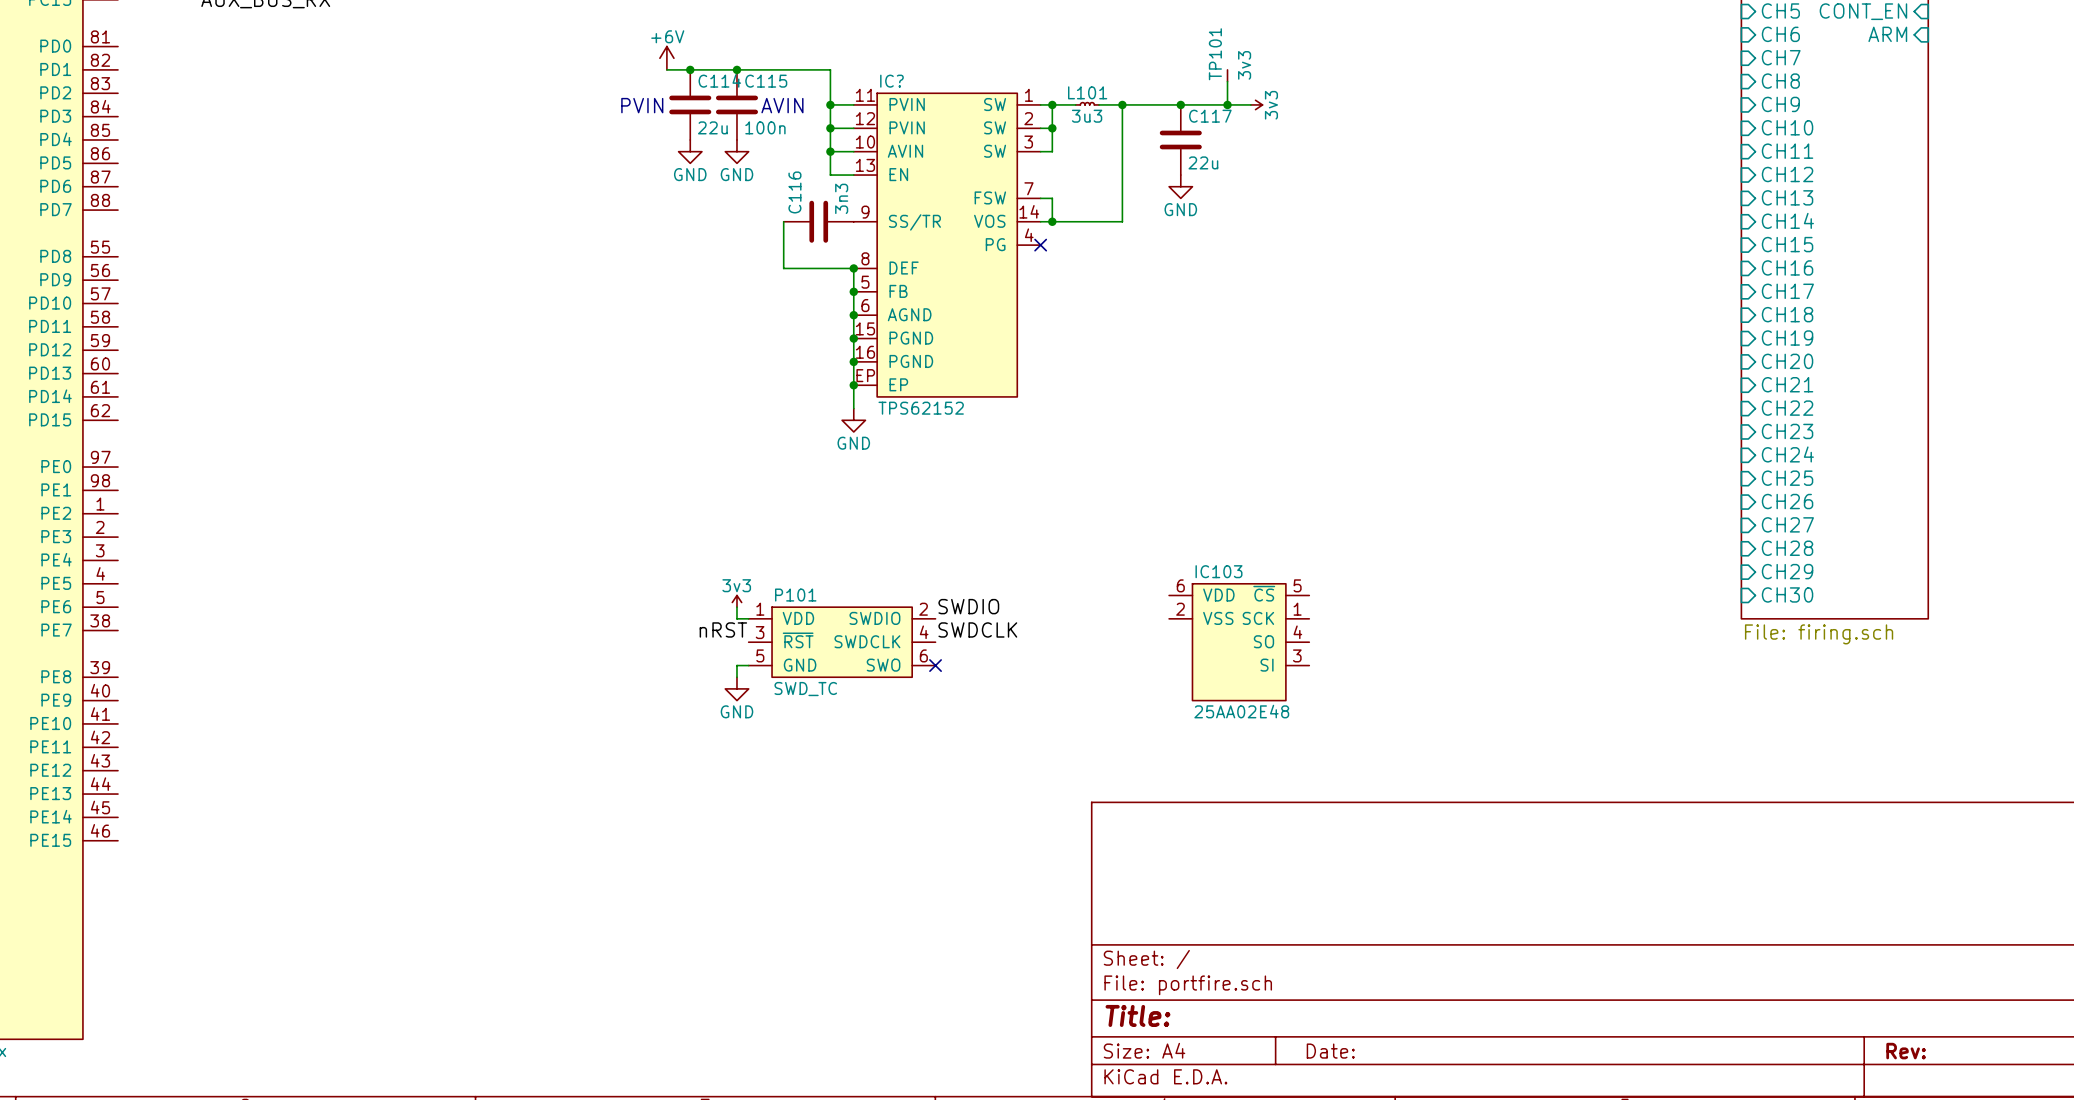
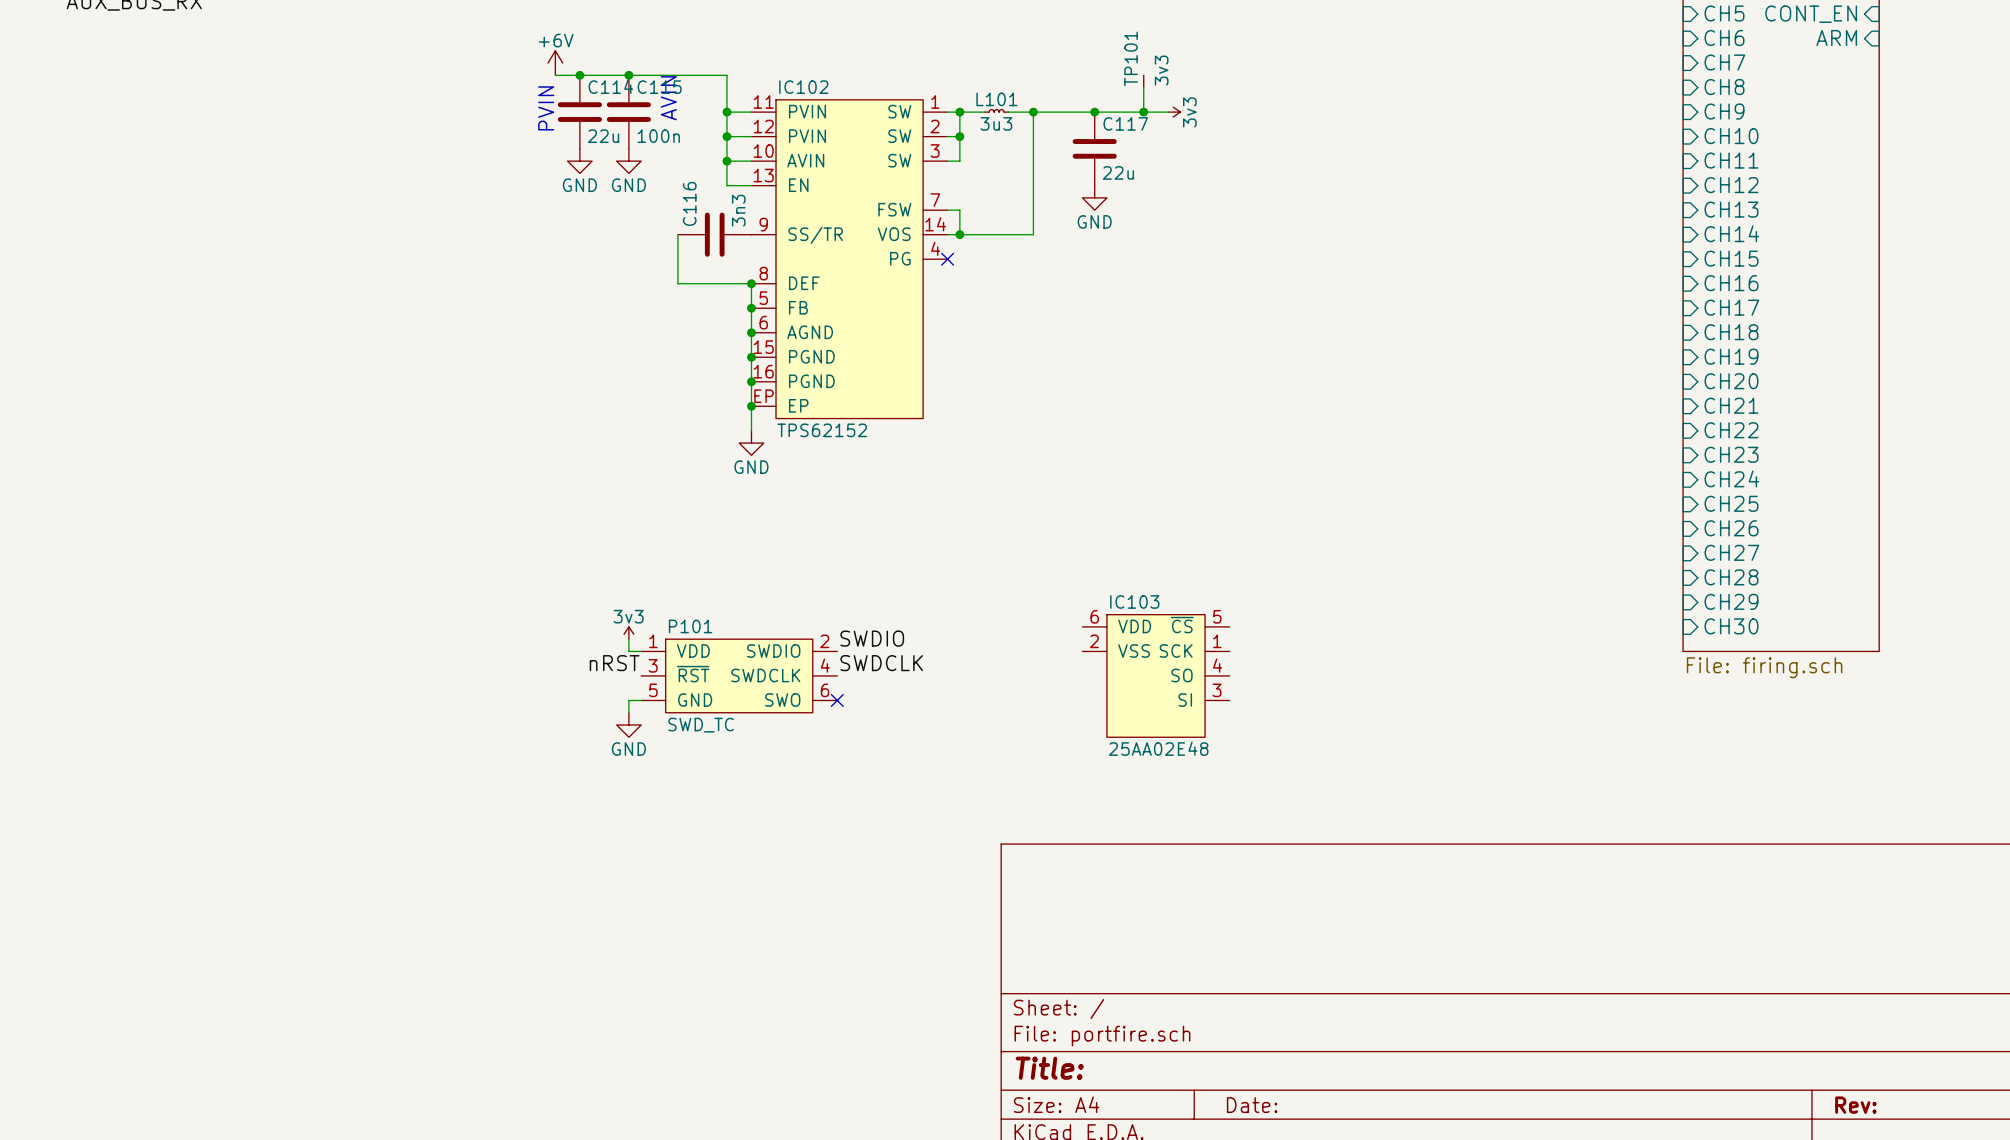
IC? name: IC? (891, 81) -> IC102 (803, 87)
text rotation: 0° (642, 105) -> 90° counterclockwise (546, 108)
text rotation: 0° (782, 105) -> 90° counterclockwise (668, 98)

